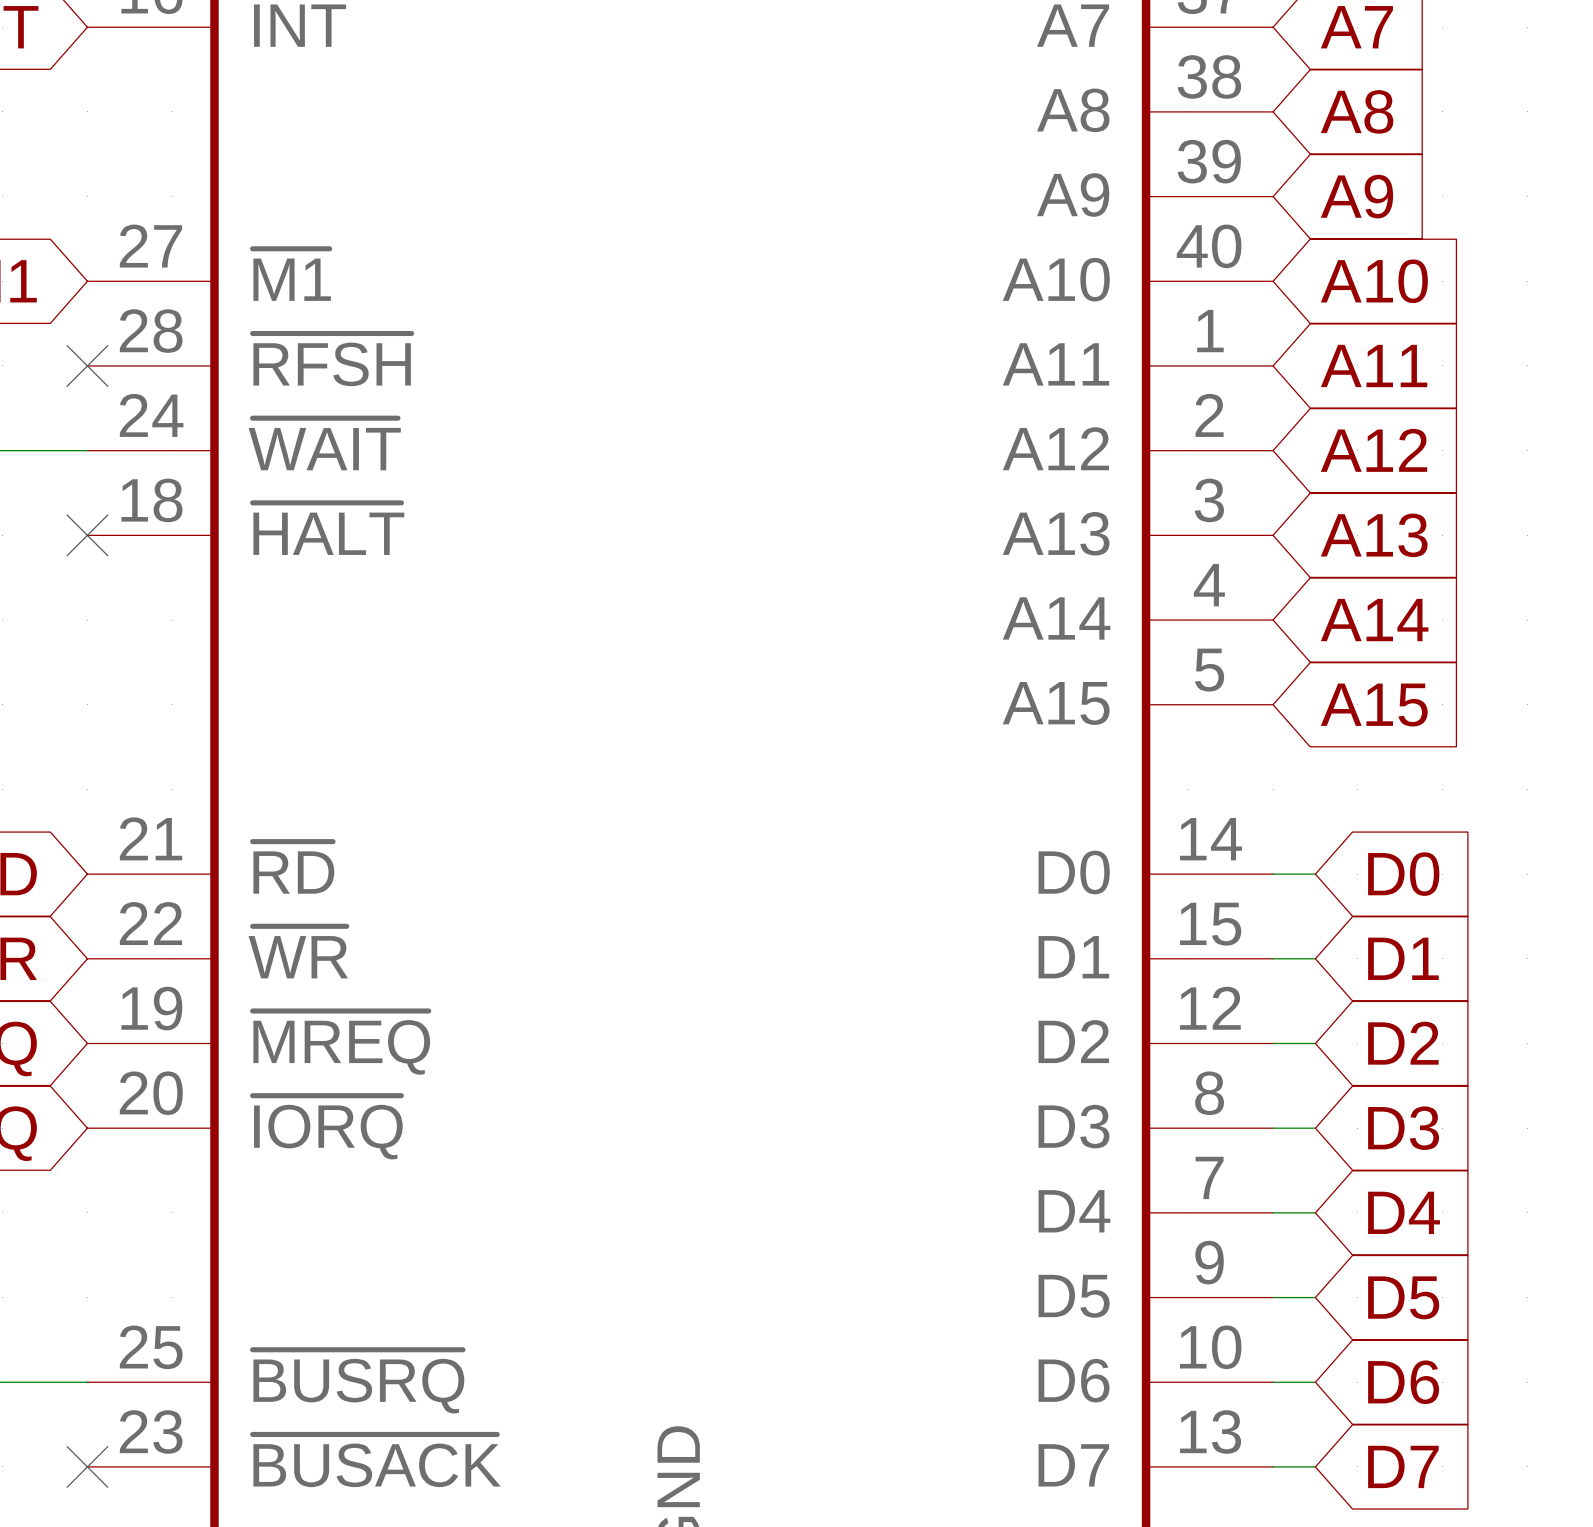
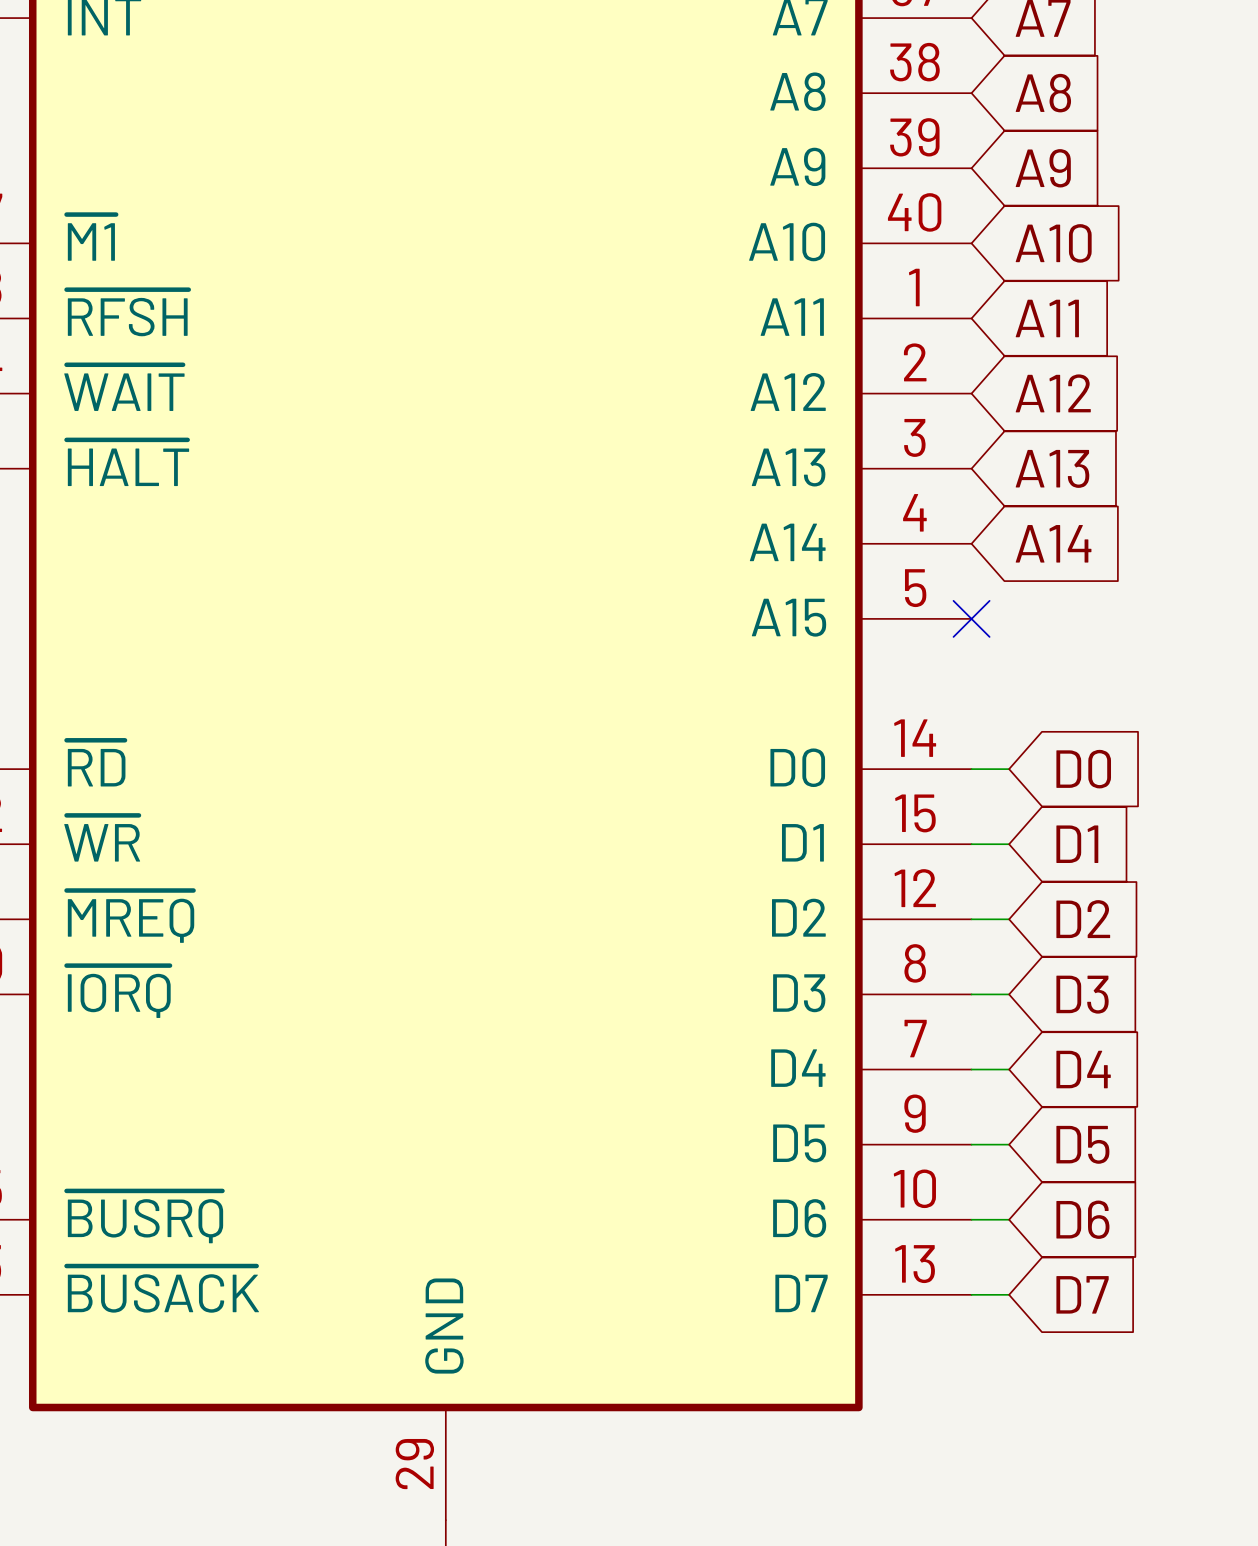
no-connect mark: none -> (971, 618)
global label: A15 (1374, 705) -> none

